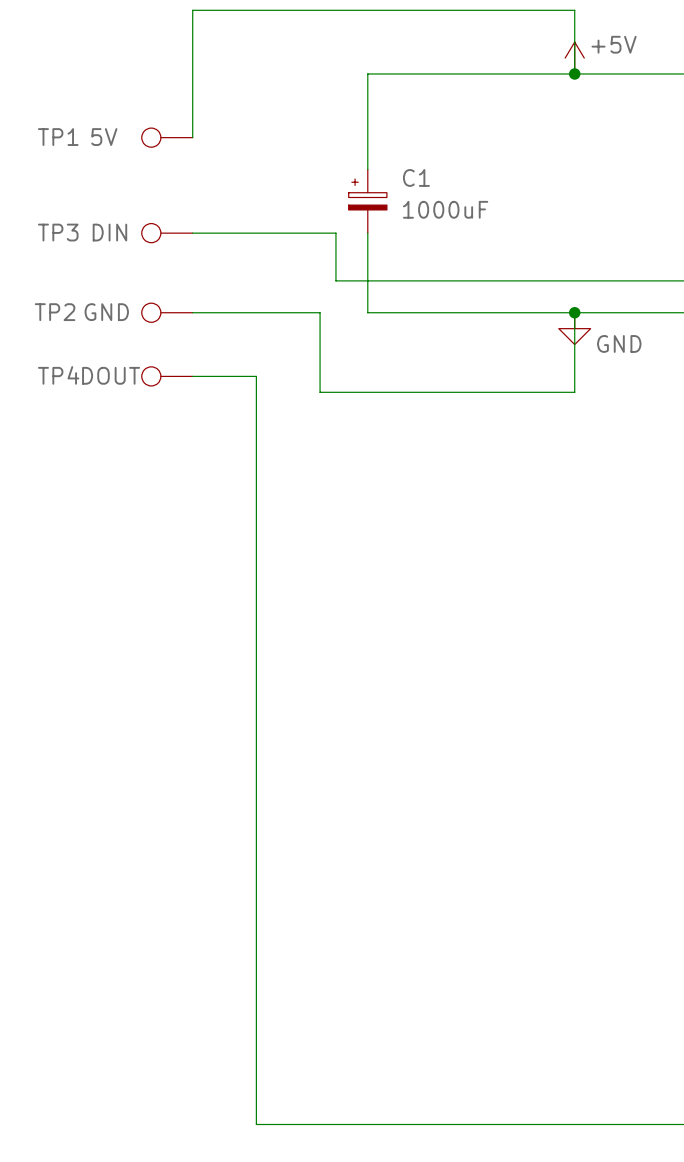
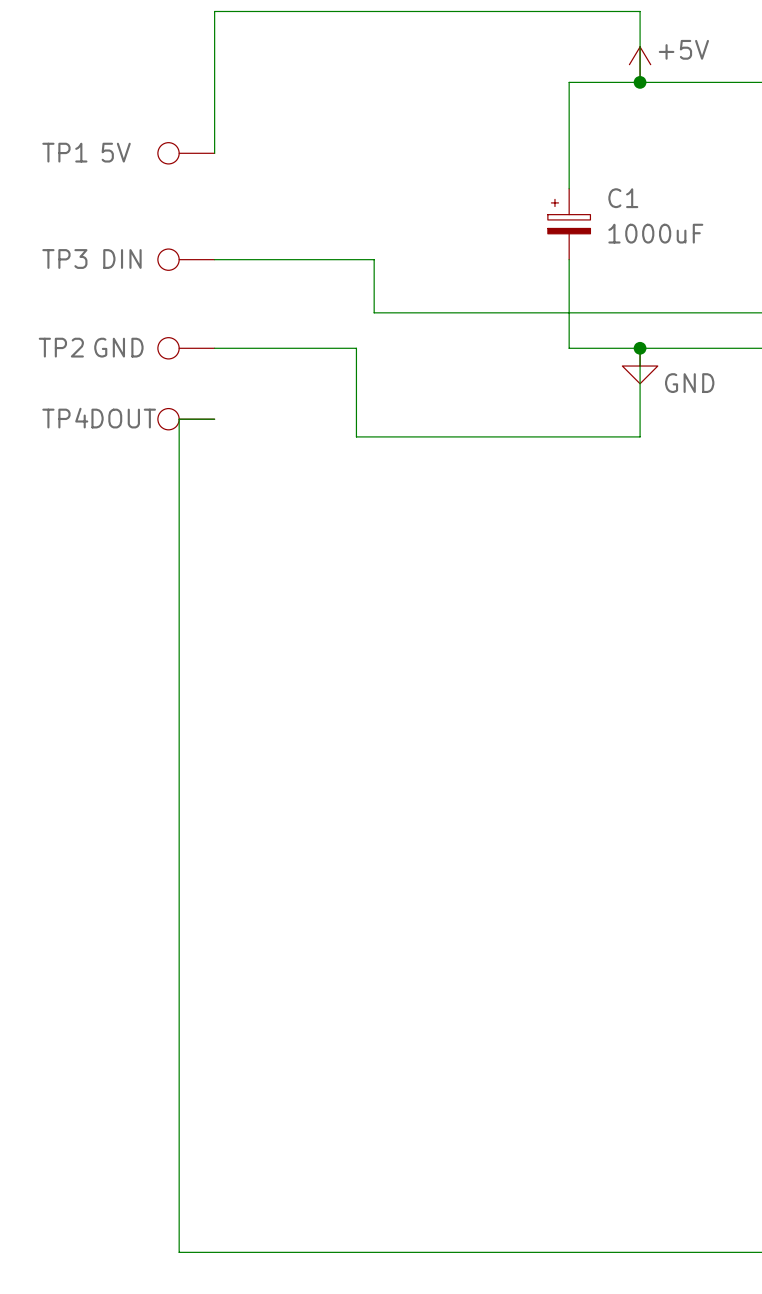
wire: (511, 73) (367, 73) (367, 169) -> (569, 82) (569, 188)
C1 position: (367, 201) -> (569, 224)
wire: (367, 233) (367, 312) (511, 312) -> (569, 259) (569, 348)
wire: (192, 376) (256, 376) (256, 1124) -> (214, 419) (179, 419) (179, 1252) (285, 1252)

